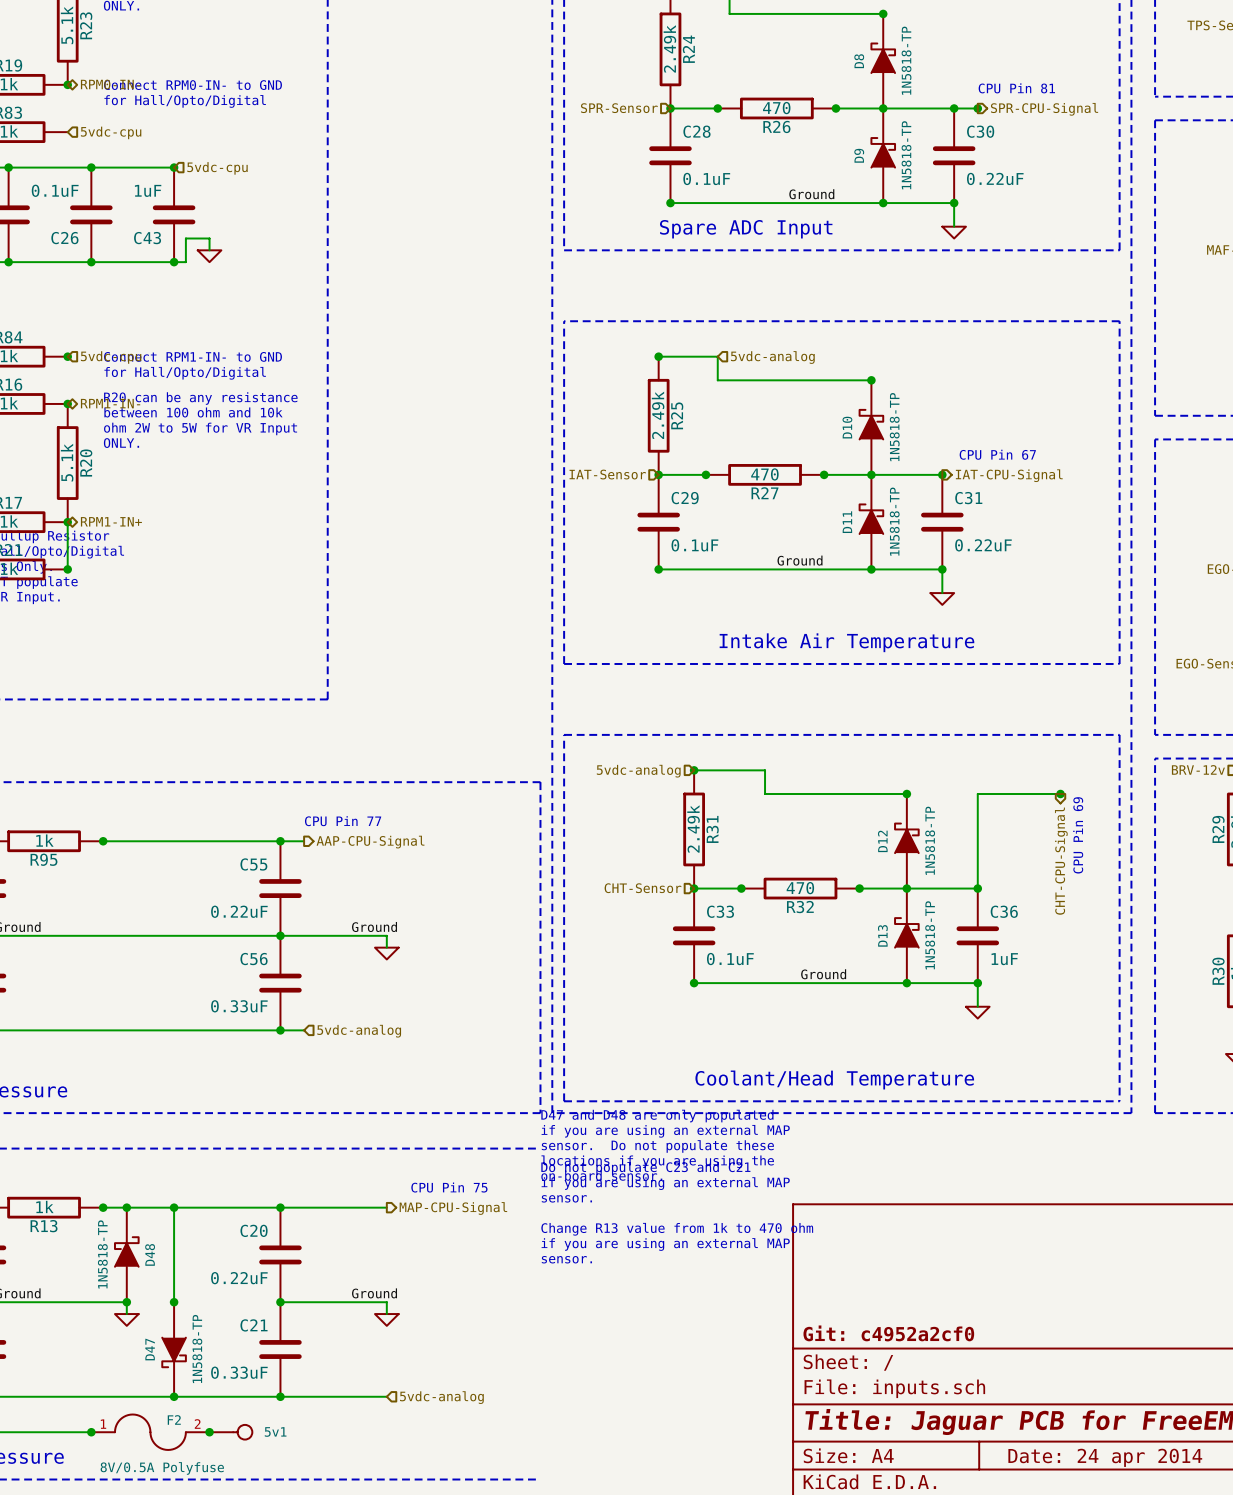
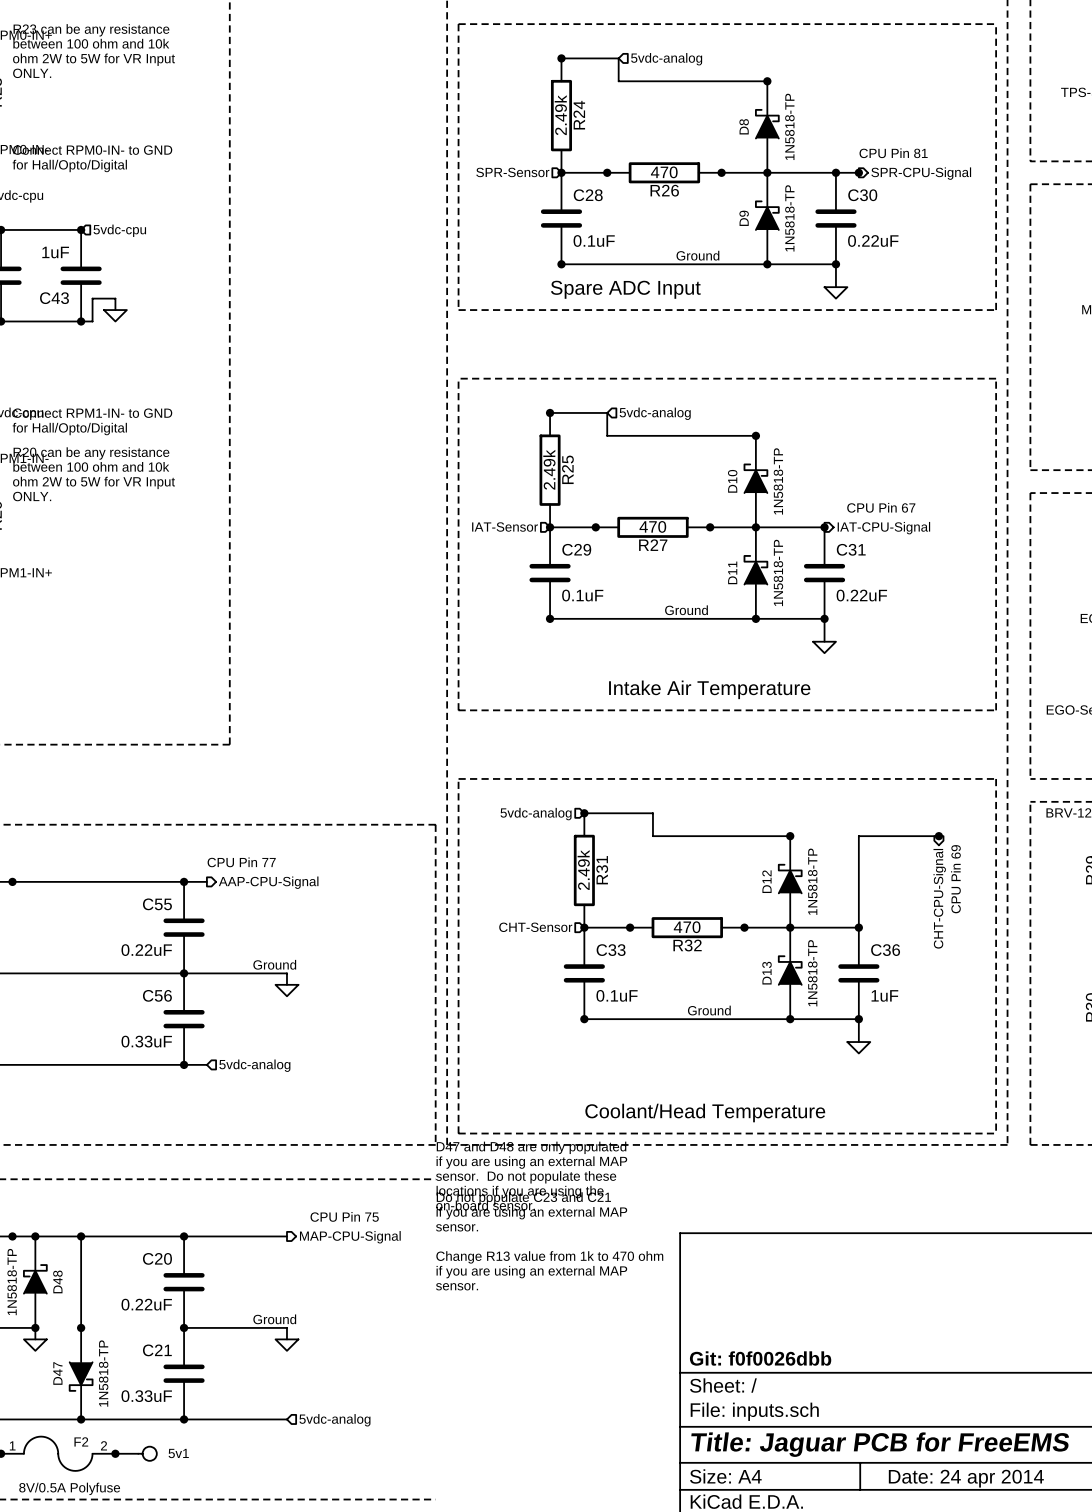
title block: Git: c4952a2cf0 (888, 1333) -> Git: f0f0026dbb (760, 1358)

